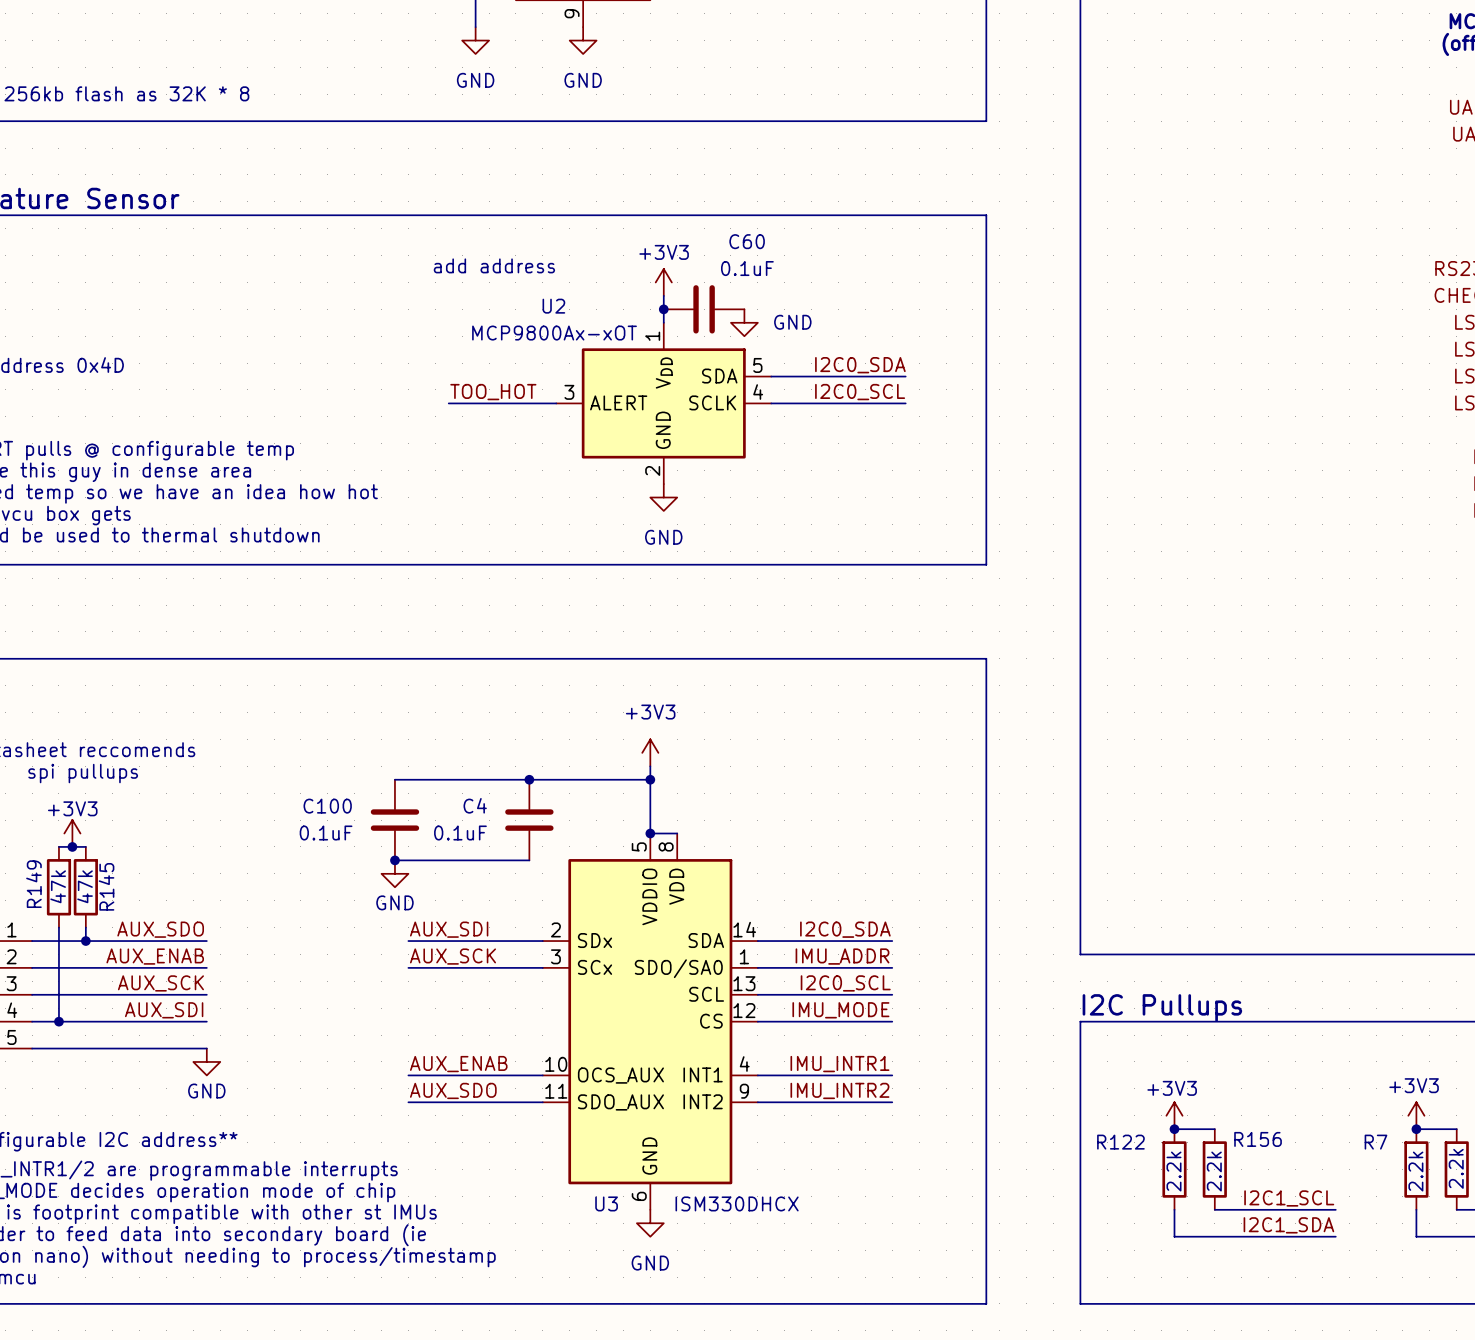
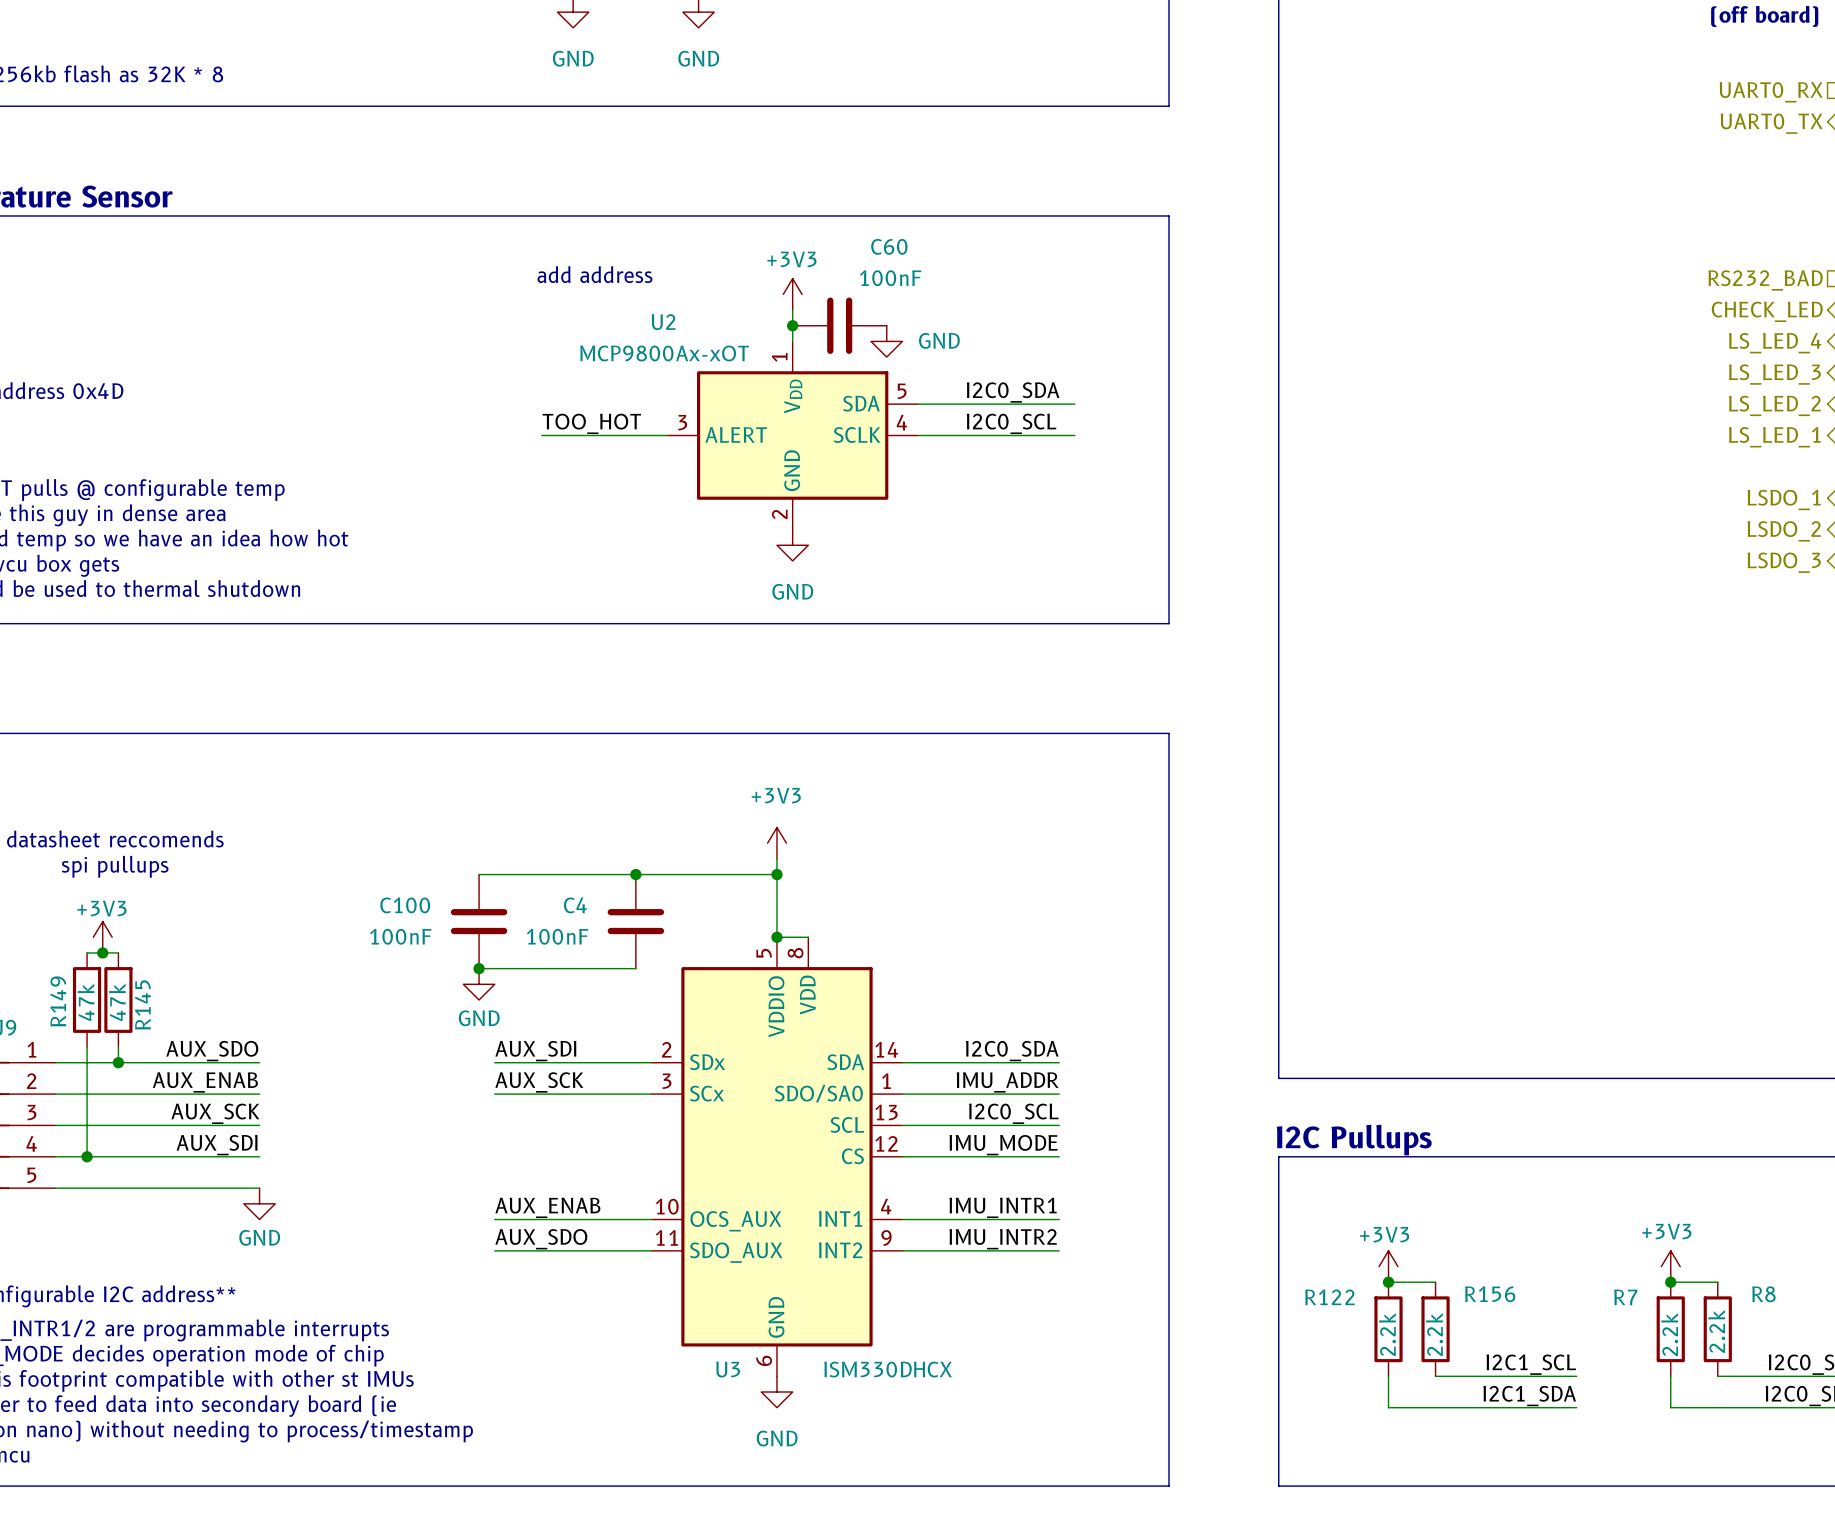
C60 value: 0.1uF (747, 268) -> 100nF (890, 278)
C100 value: 0.1uF (326, 833) -> 100nF (400, 936)
C4 value: 0.1uF (460, 833) -> 100nF (557, 936)

